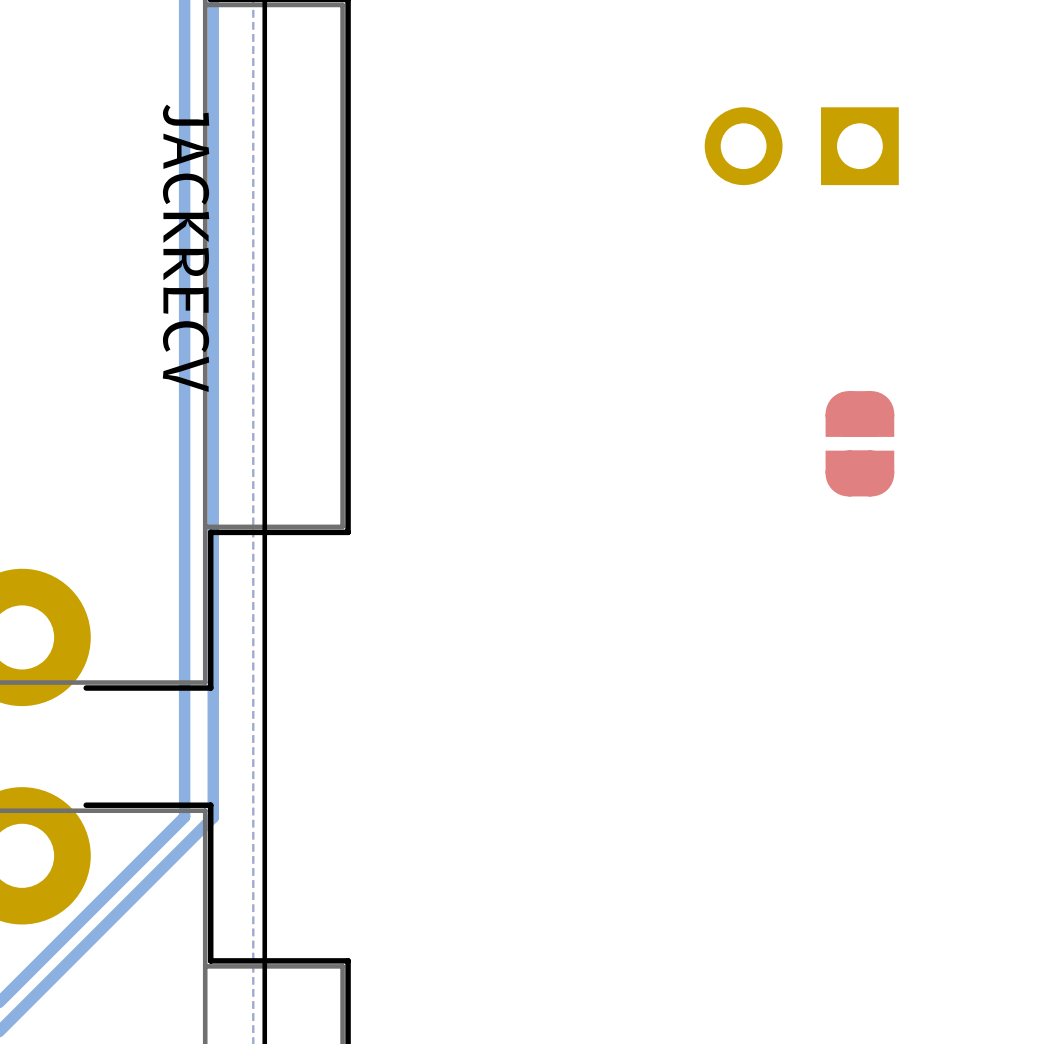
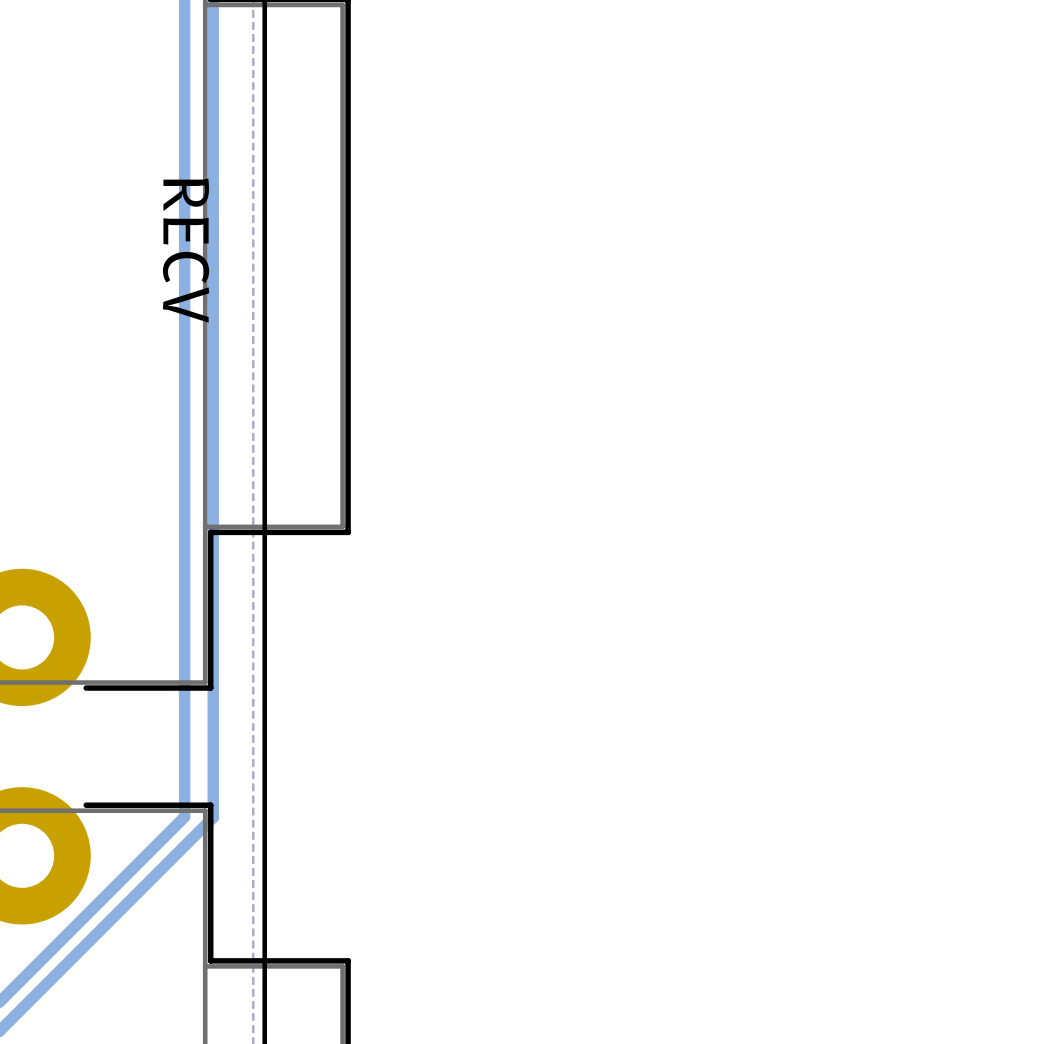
part: (801, 146) -> none
part value: JACKRECV (186, 248) -> RECV (186, 250)
part: (859, 443) -> none

